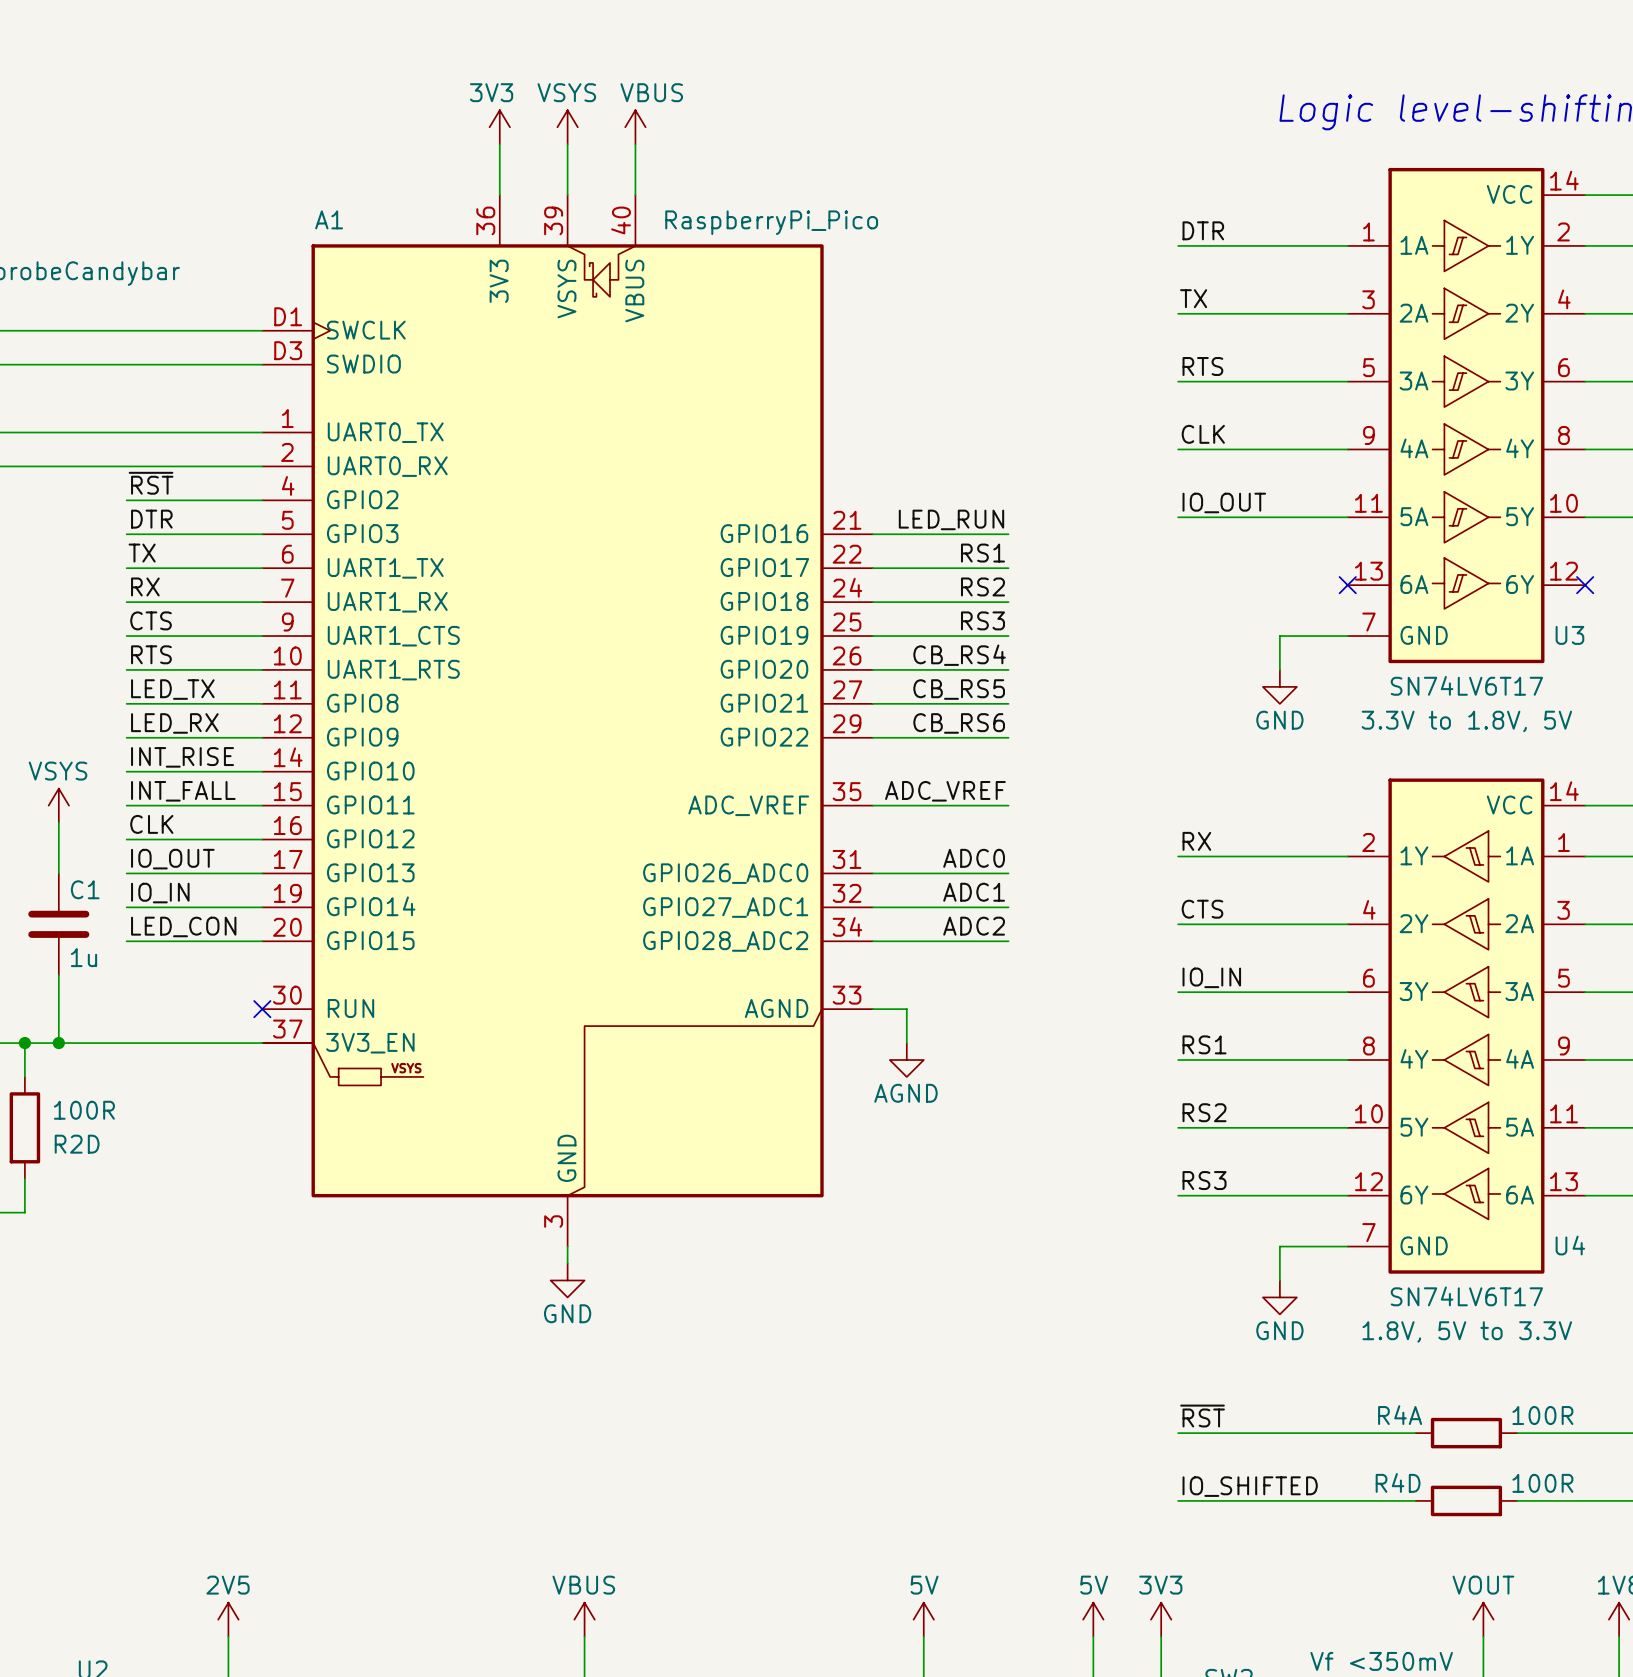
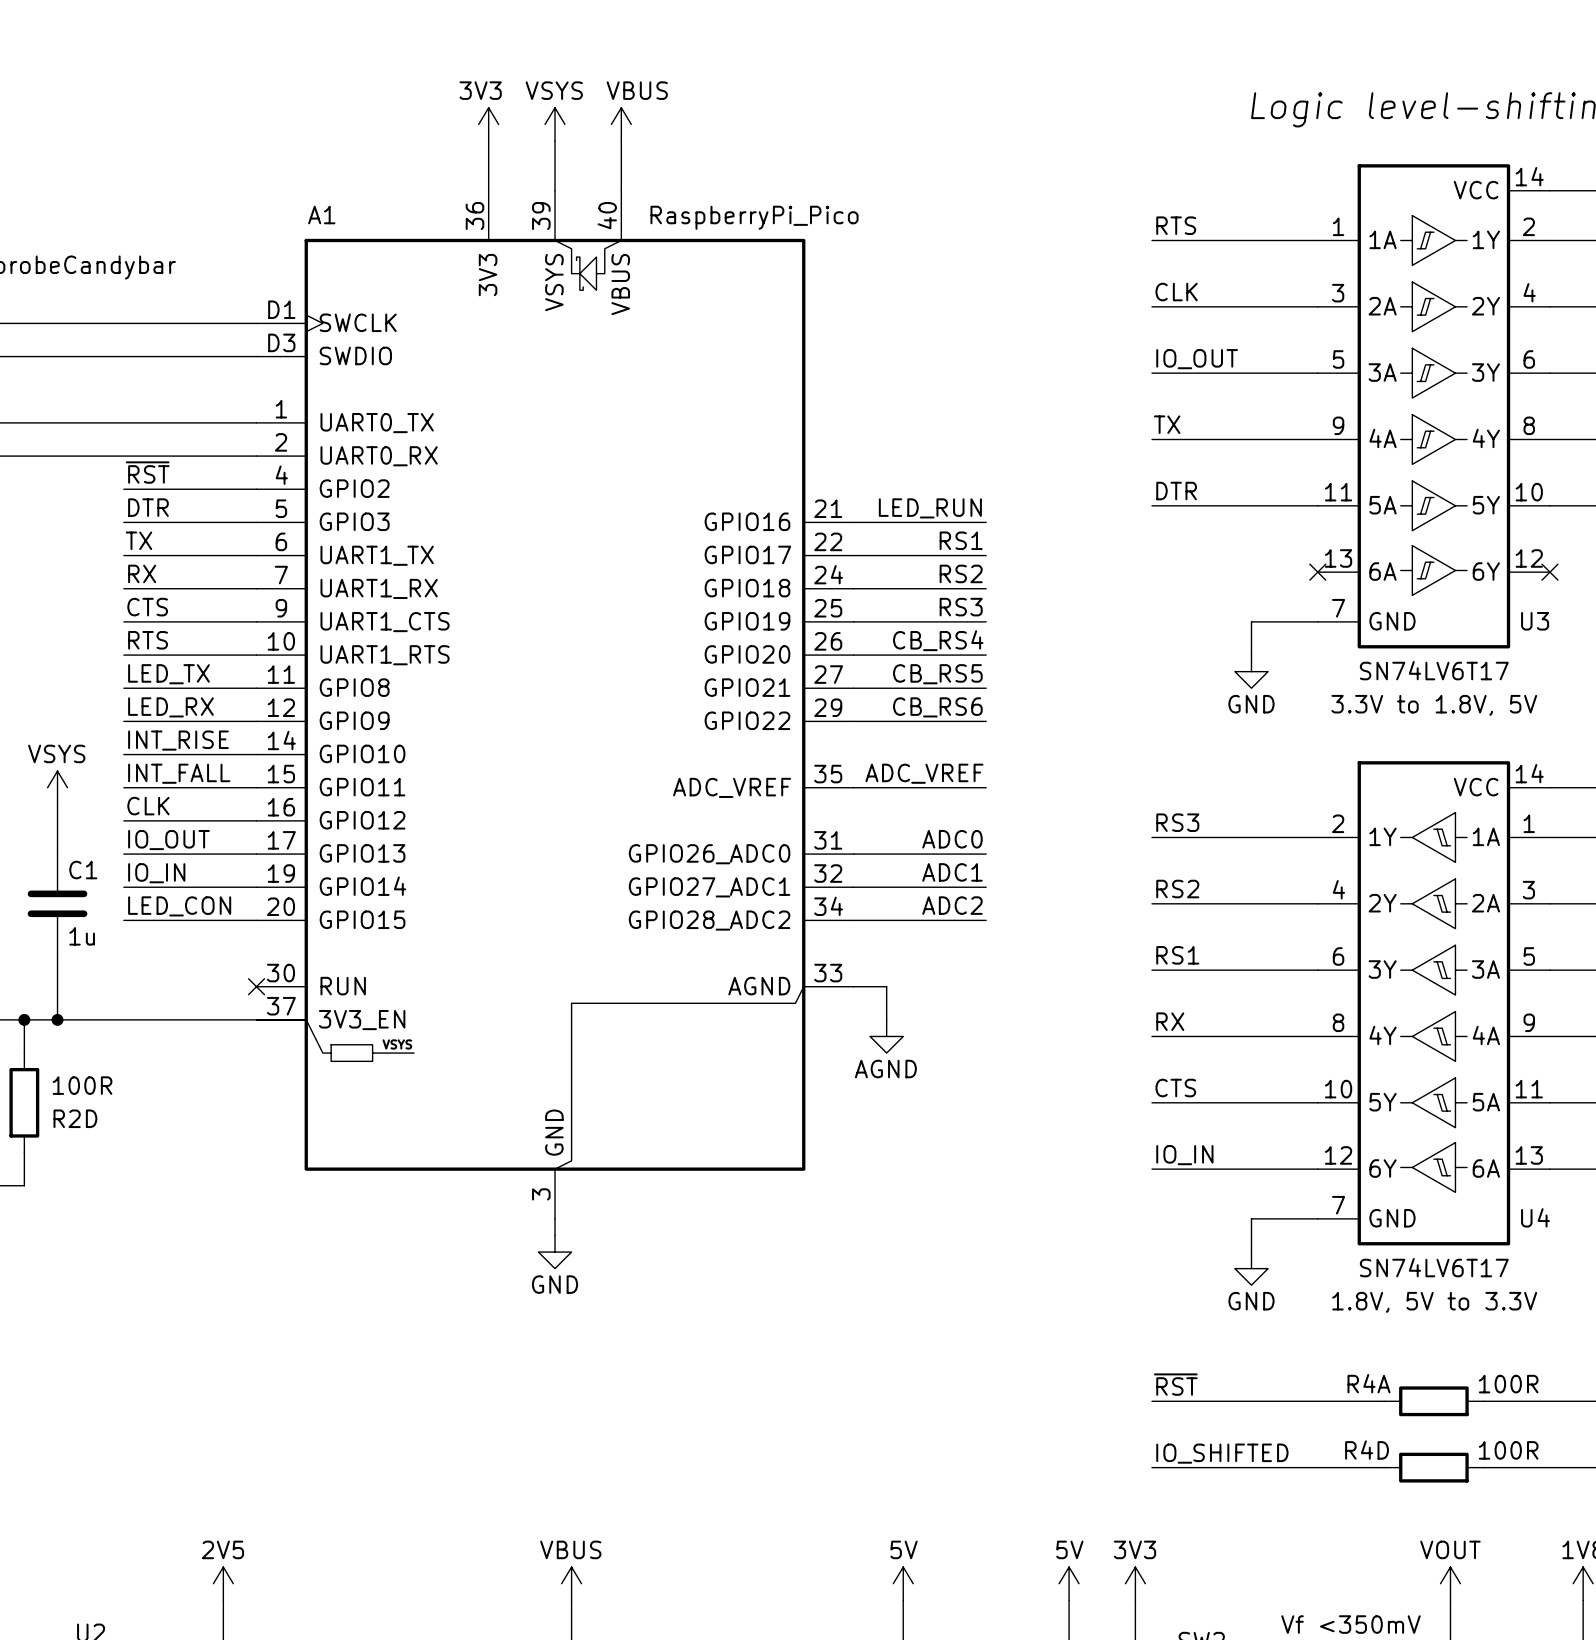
label: DTR (1203, 230) -> RTS (1176, 225)
label: TX (1193, 298) -> CLK (1176, 292)
label: RTS (1202, 366) -> IO_OUT (1197, 359)
label: CLK (1203, 434) -> TX (1167, 424)
label: IO_OUT (1224, 502) -> DTR (1176, 491)
label: RX (1196, 841) -> RS3 (1177, 822)
label: CTS (1202, 909) -> RS2 (1177, 889)
label: IO_IN (1211, 977) -> RS1 (1177, 955)
label: RS1 (1204, 1044) -> RX (1170, 1021)
label: RS2 (1204, 1112) -> CTS (1175, 1088)
label: RS3 (1204, 1180) -> IO_IN (1184, 1155)

